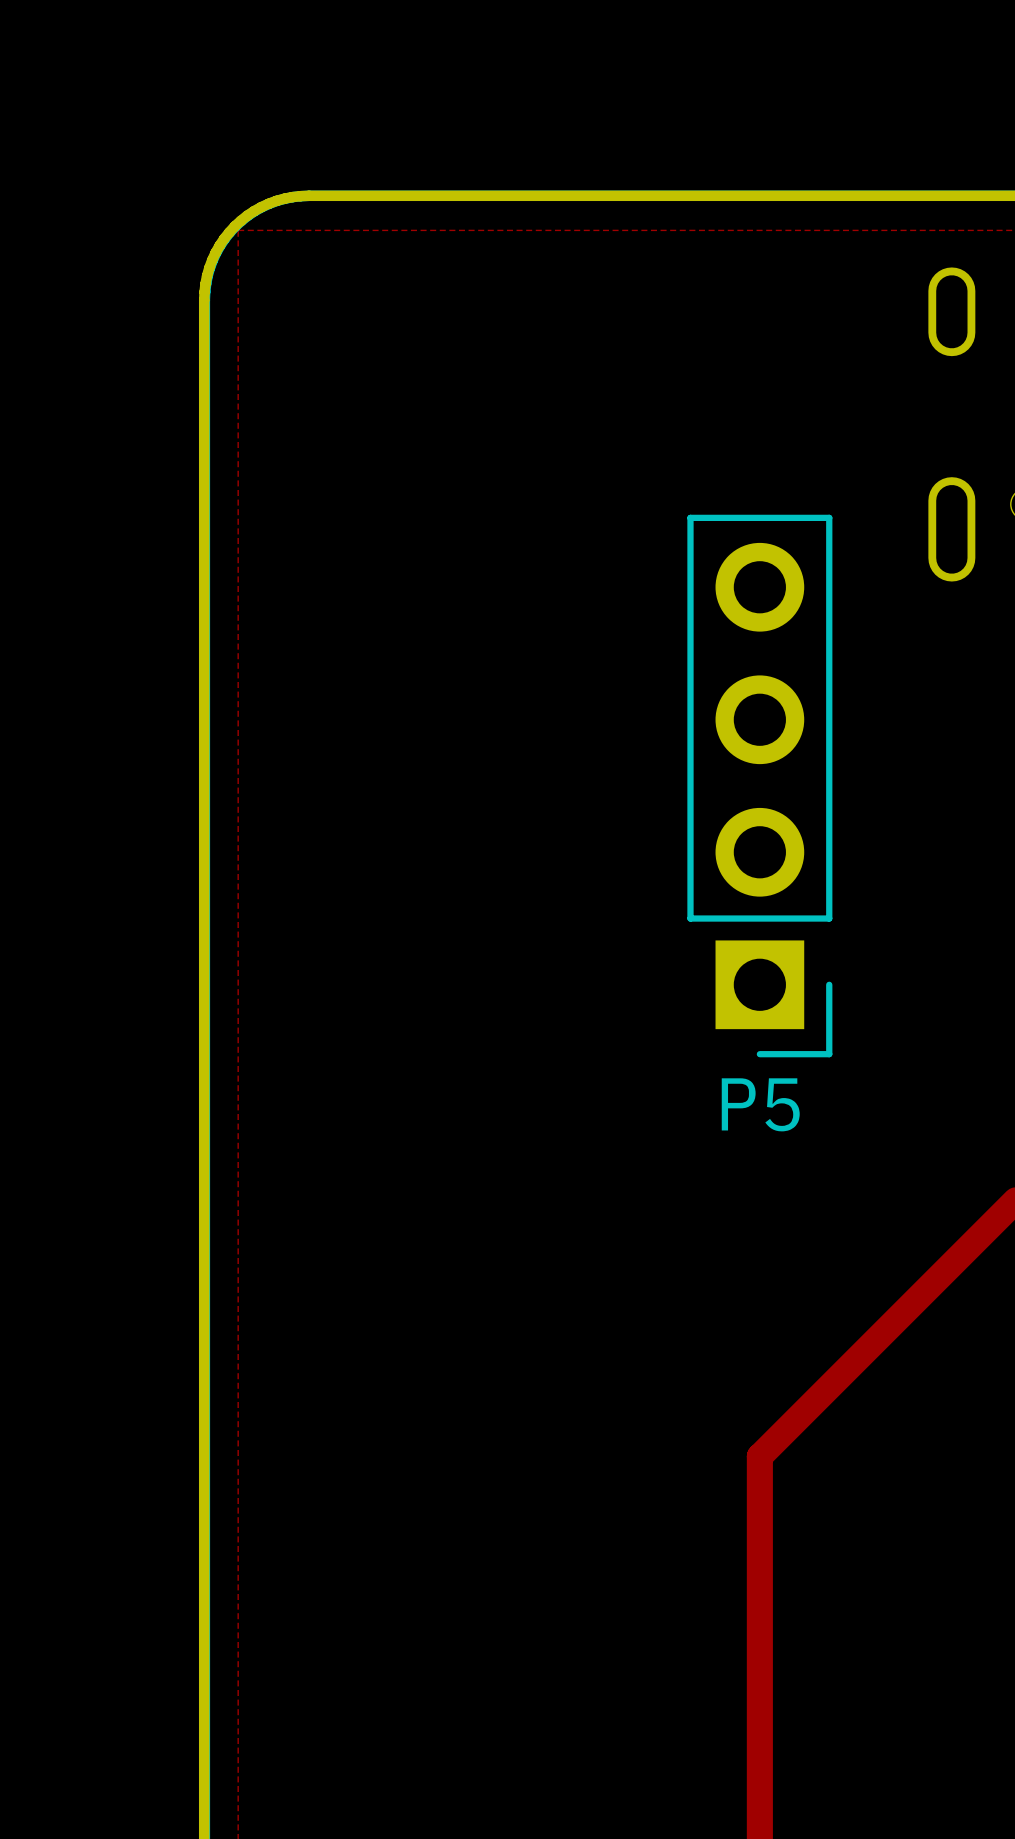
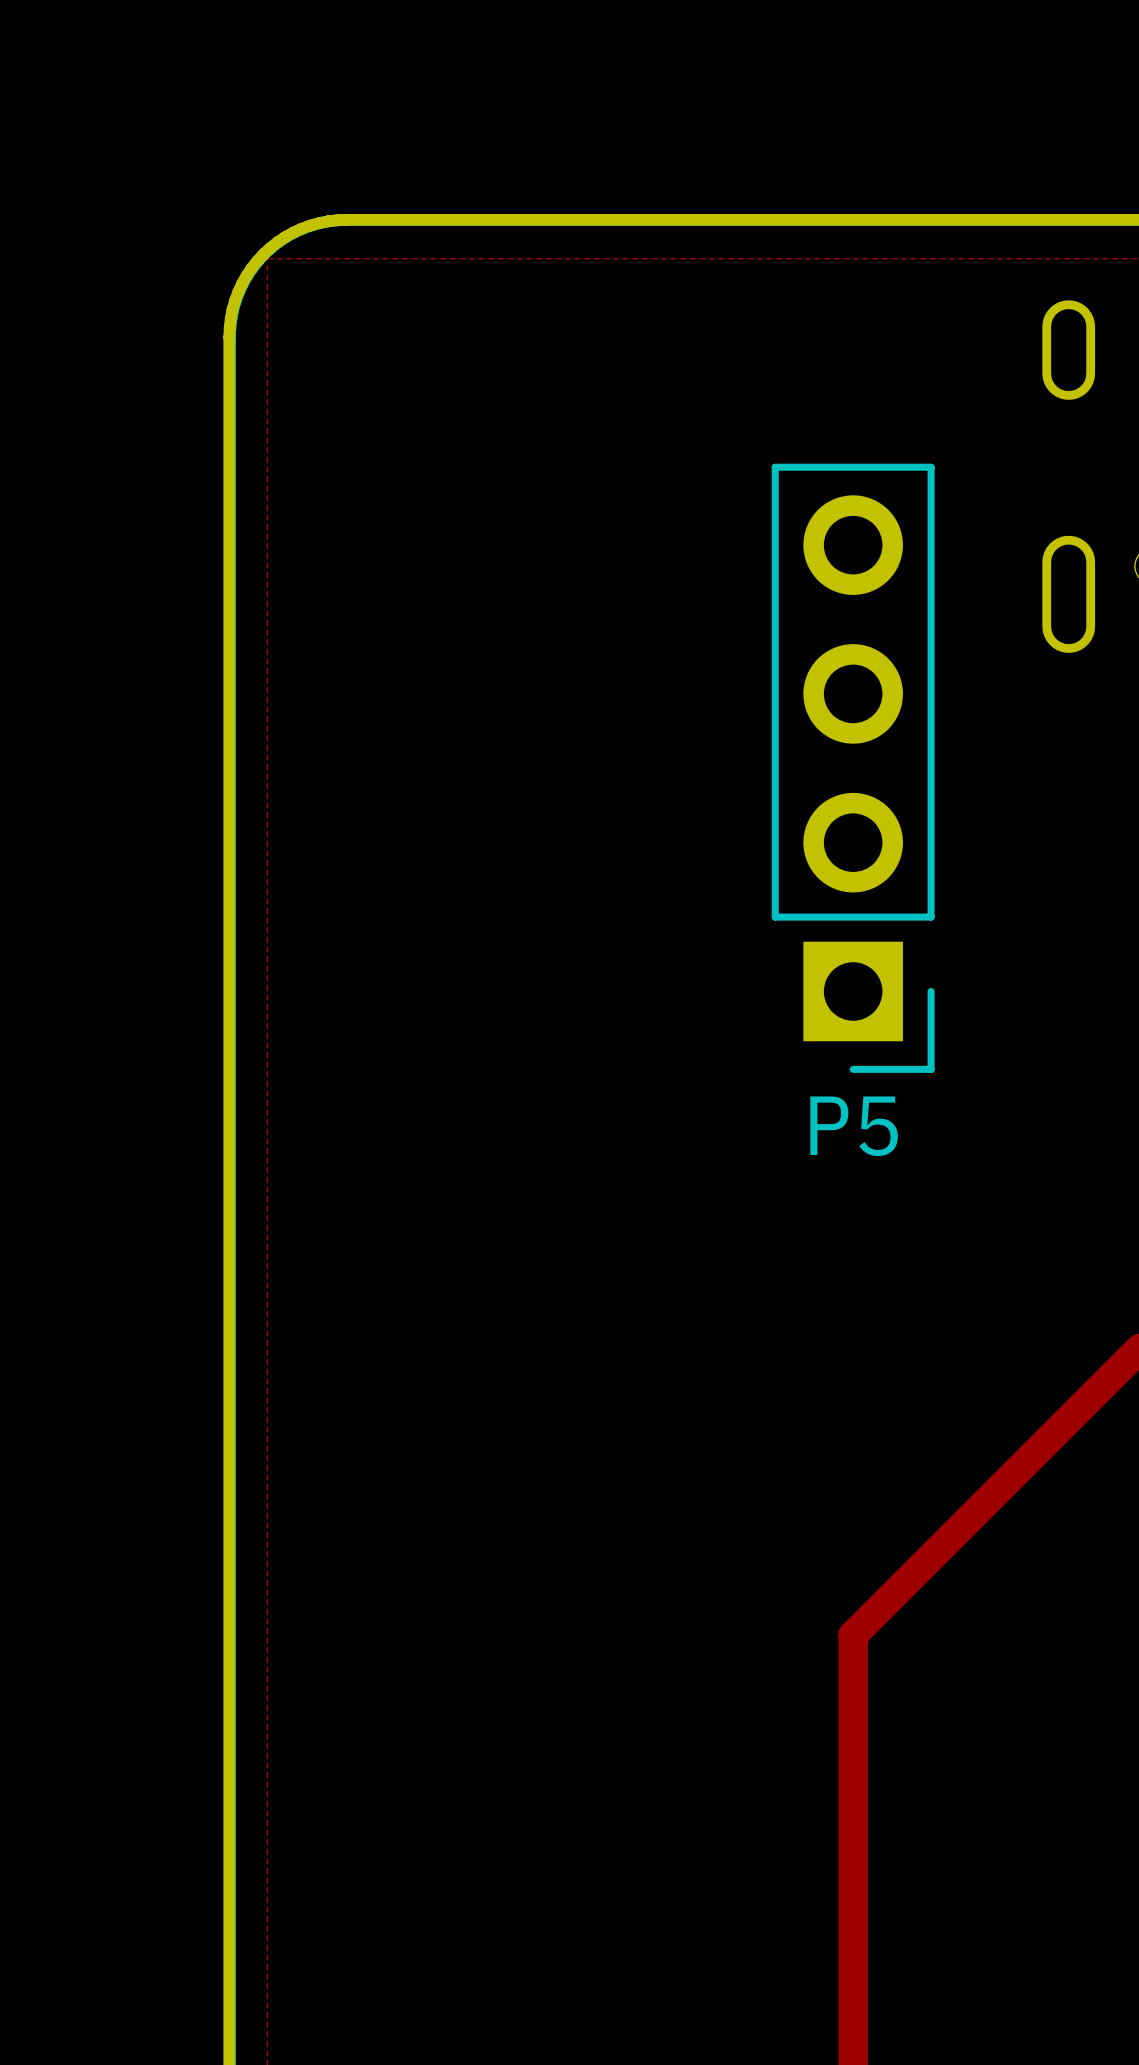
P5 position: (759, 786) -> (853, 768)

